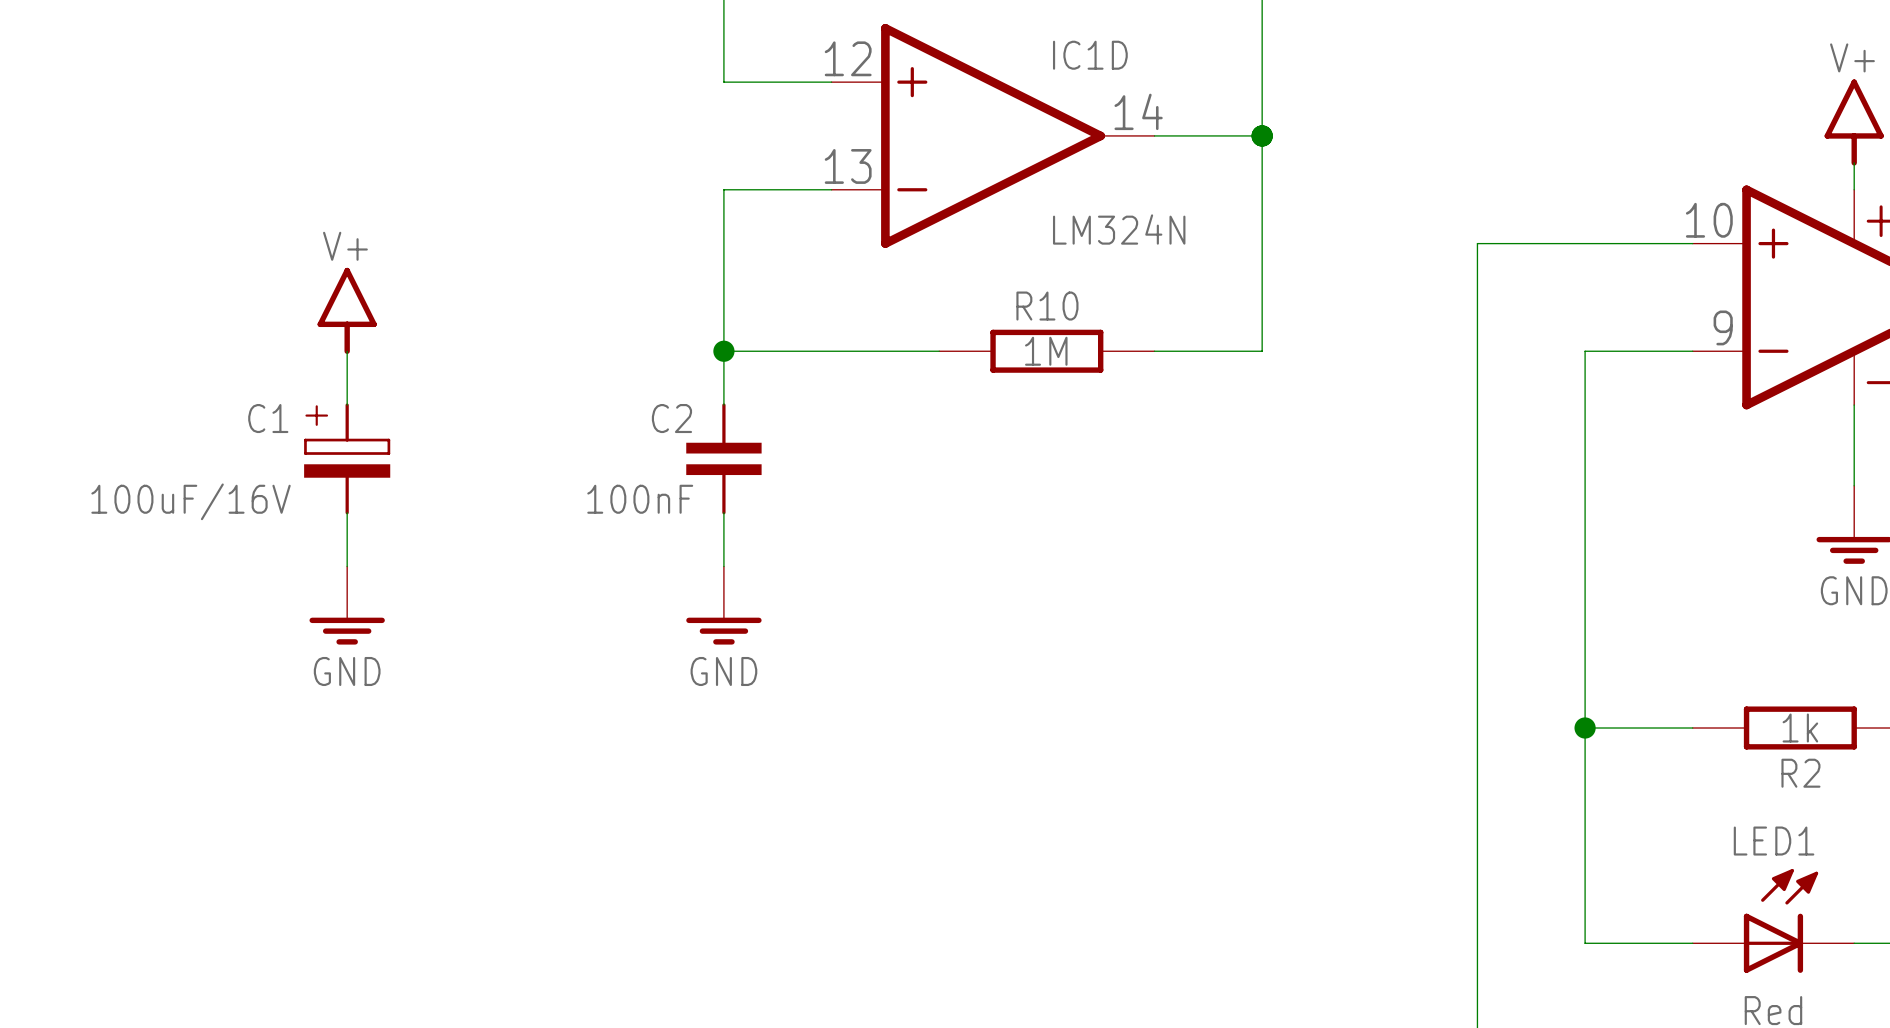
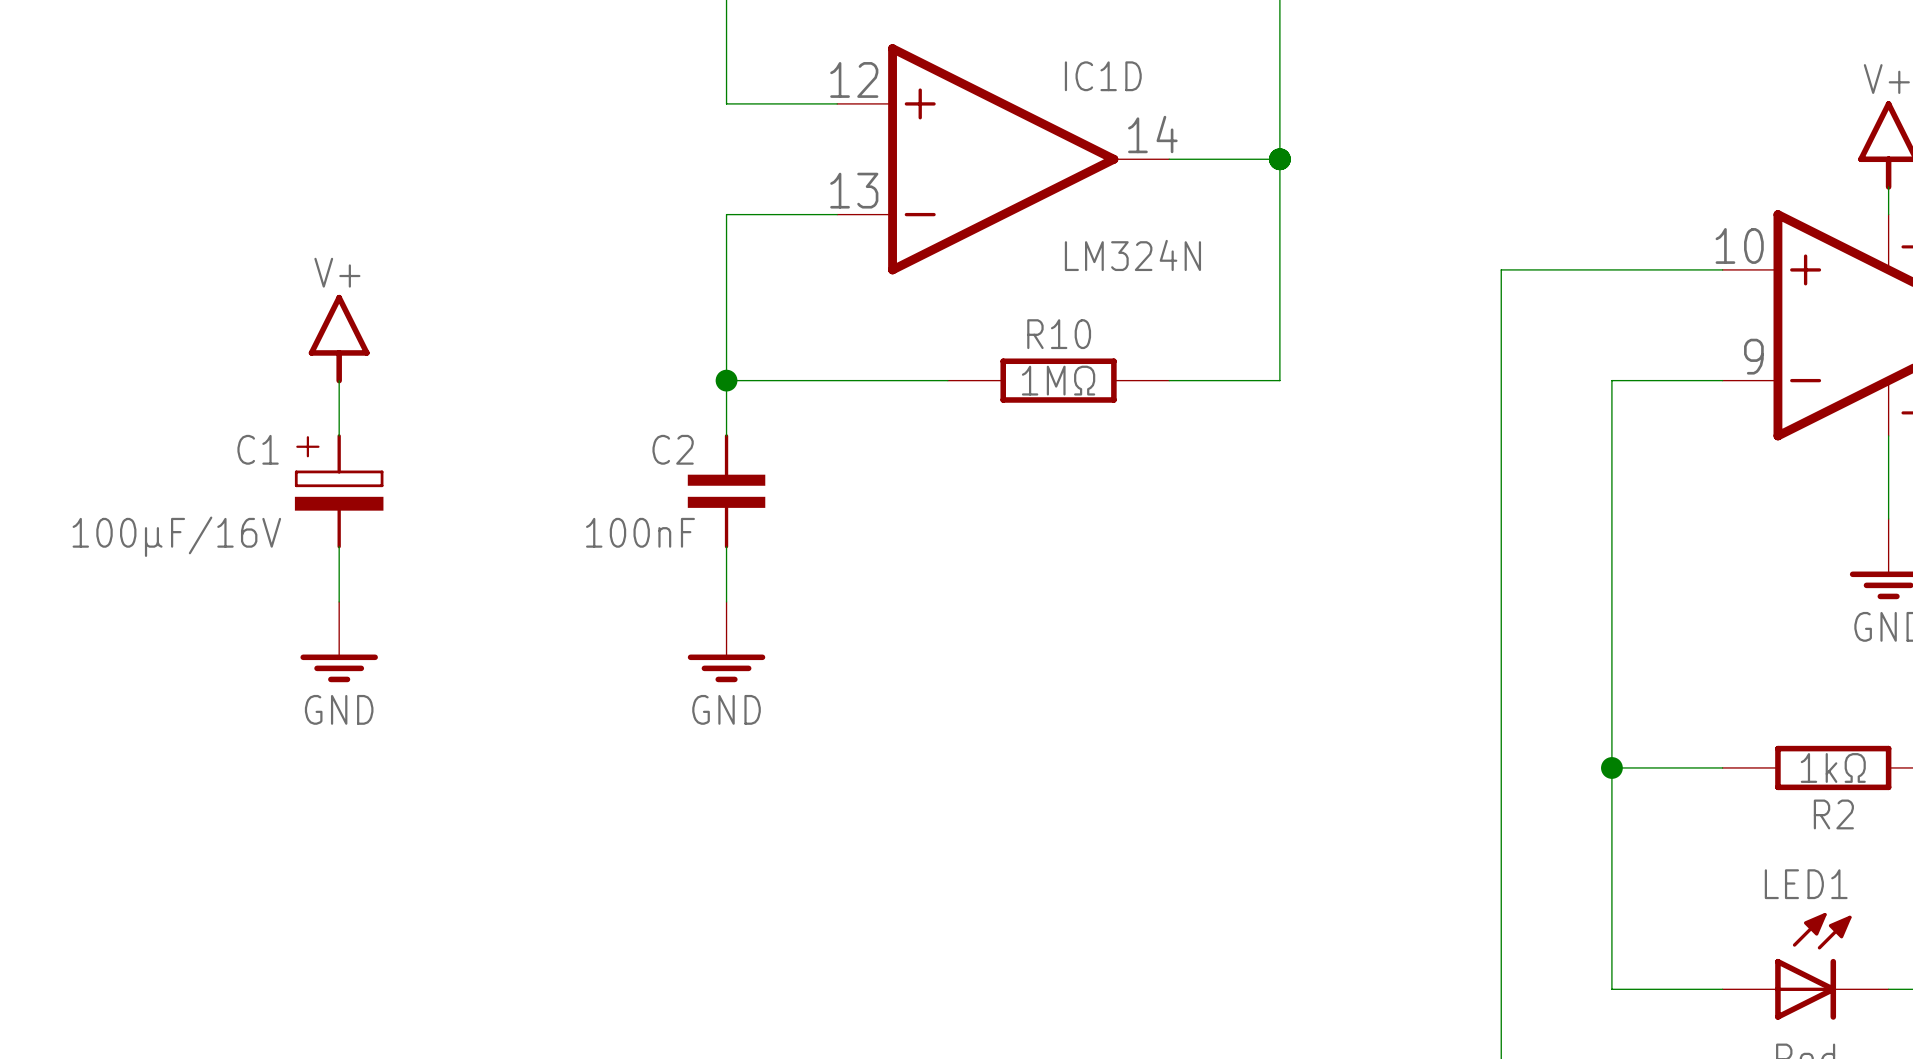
R10 value: 1M (1046, 351) -> 1MΩ (1058, 380)
C1 value: 100uF/16V (191, 501) -> 100μF/16V (176, 536)
R2 value: 1k (1800, 728) -> 1kΩ (1833, 767)

